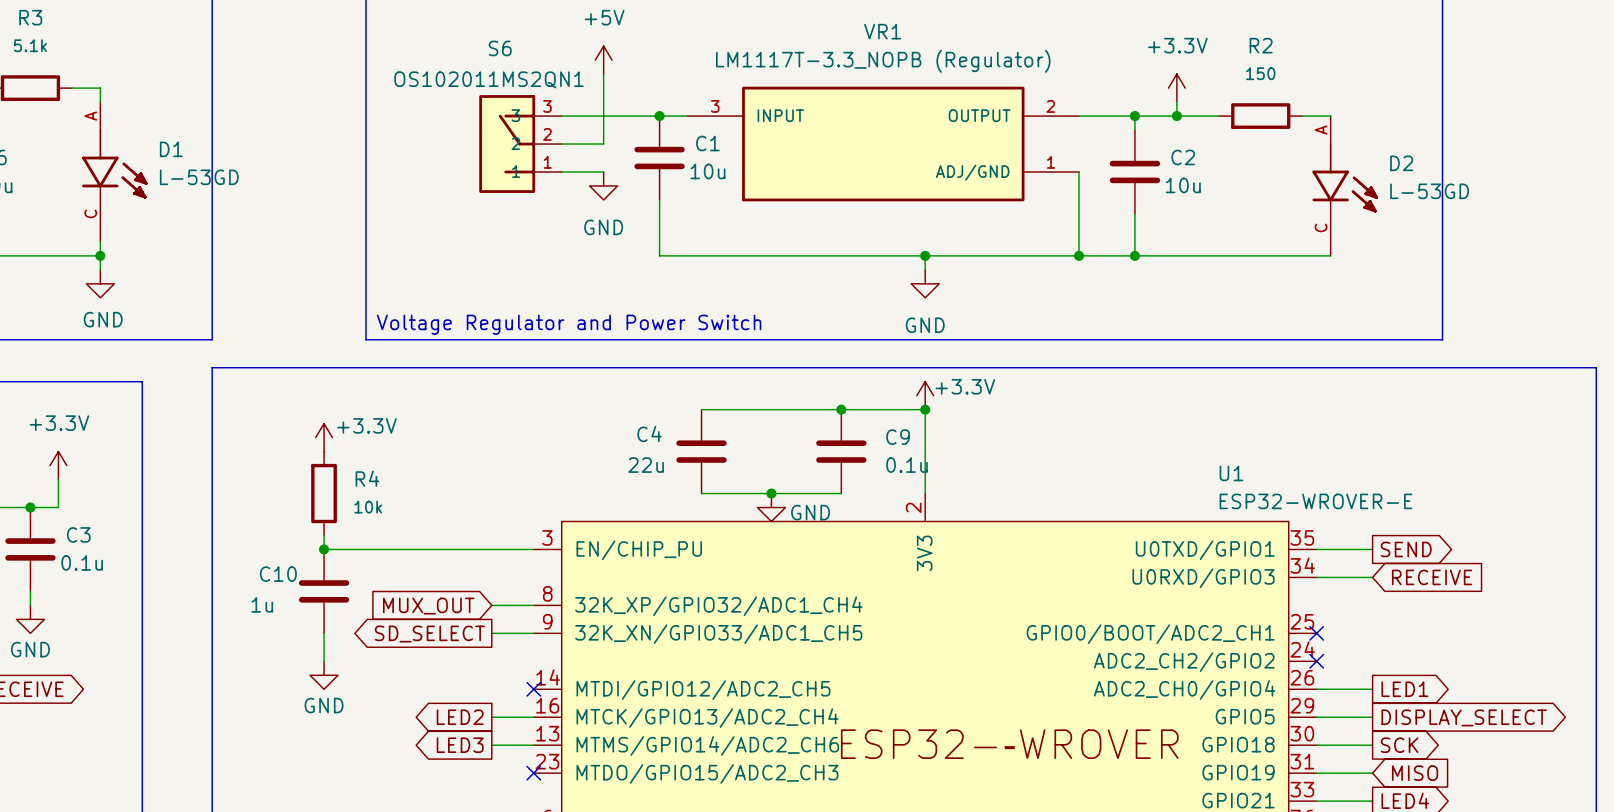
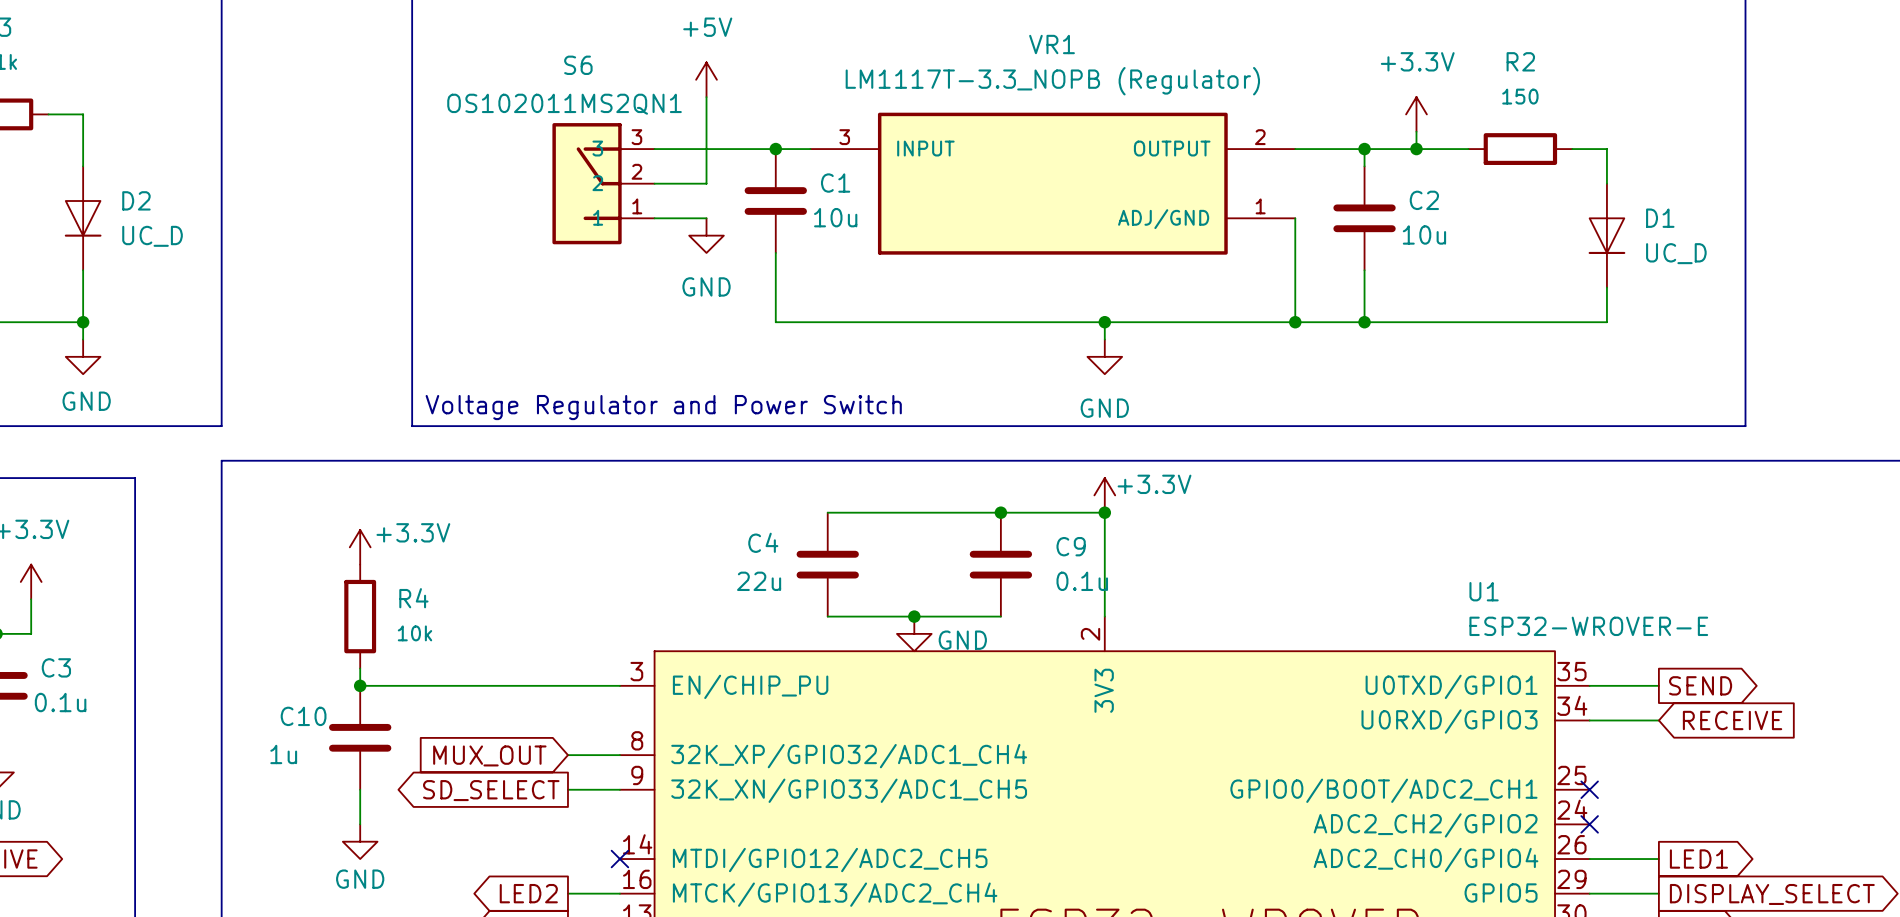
D1 symbol: [82, 102, 148, 242] -> [1588, 183, 1626, 288]
D2 symbol: [1312, 116, 1378, 256] -> [64, 166, 102, 271]
D1 value: L-53GD (199, 177) -> UC_D (1676, 253)
D2 value: L-53GD (1429, 191) -> UC_D (152, 236)

